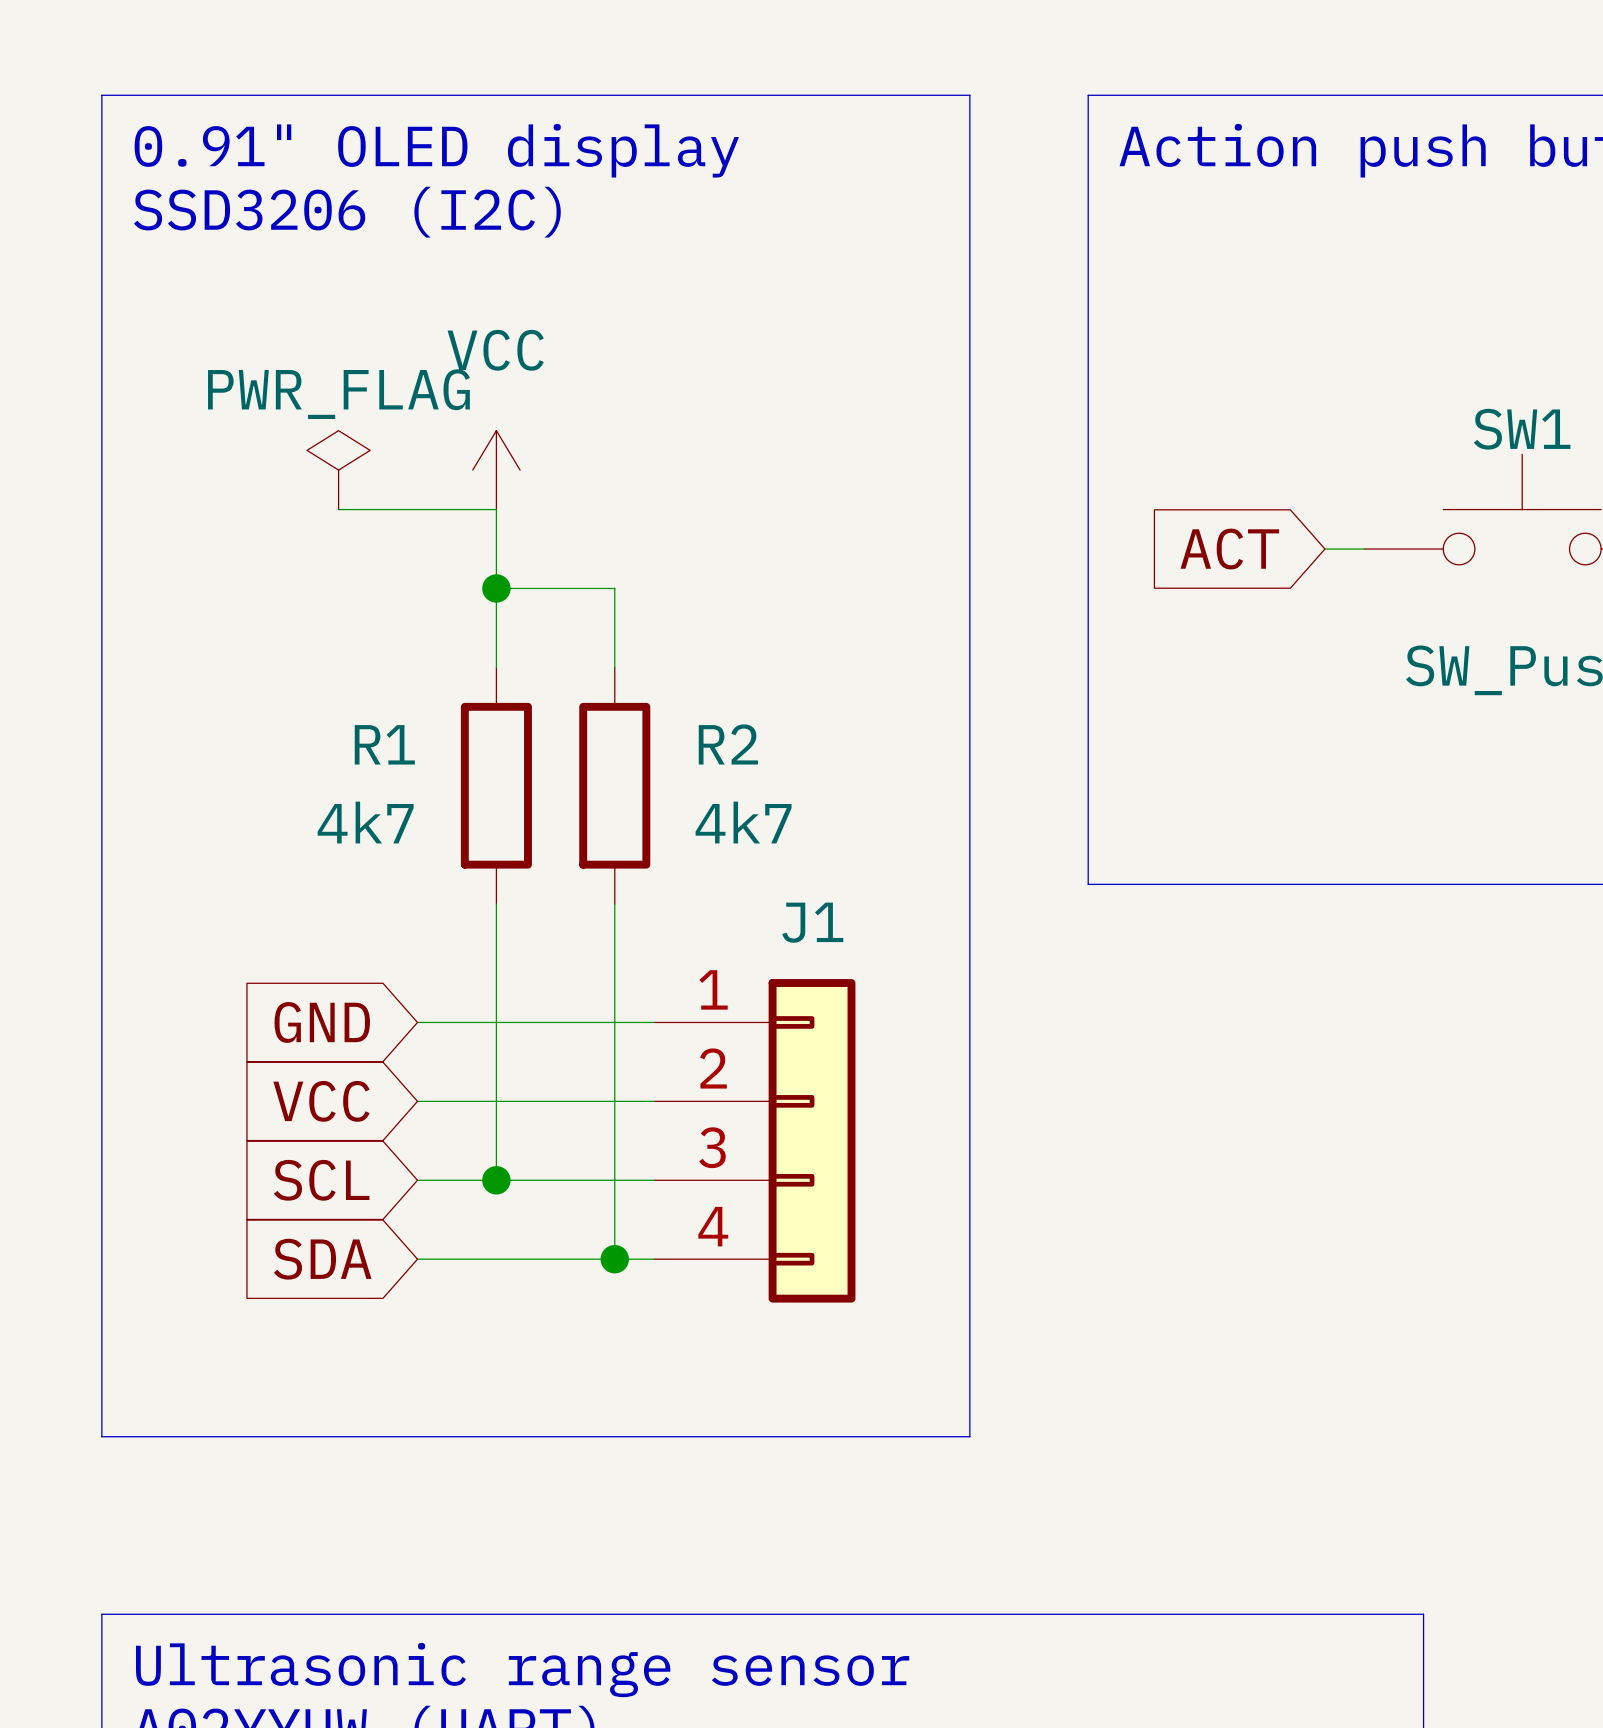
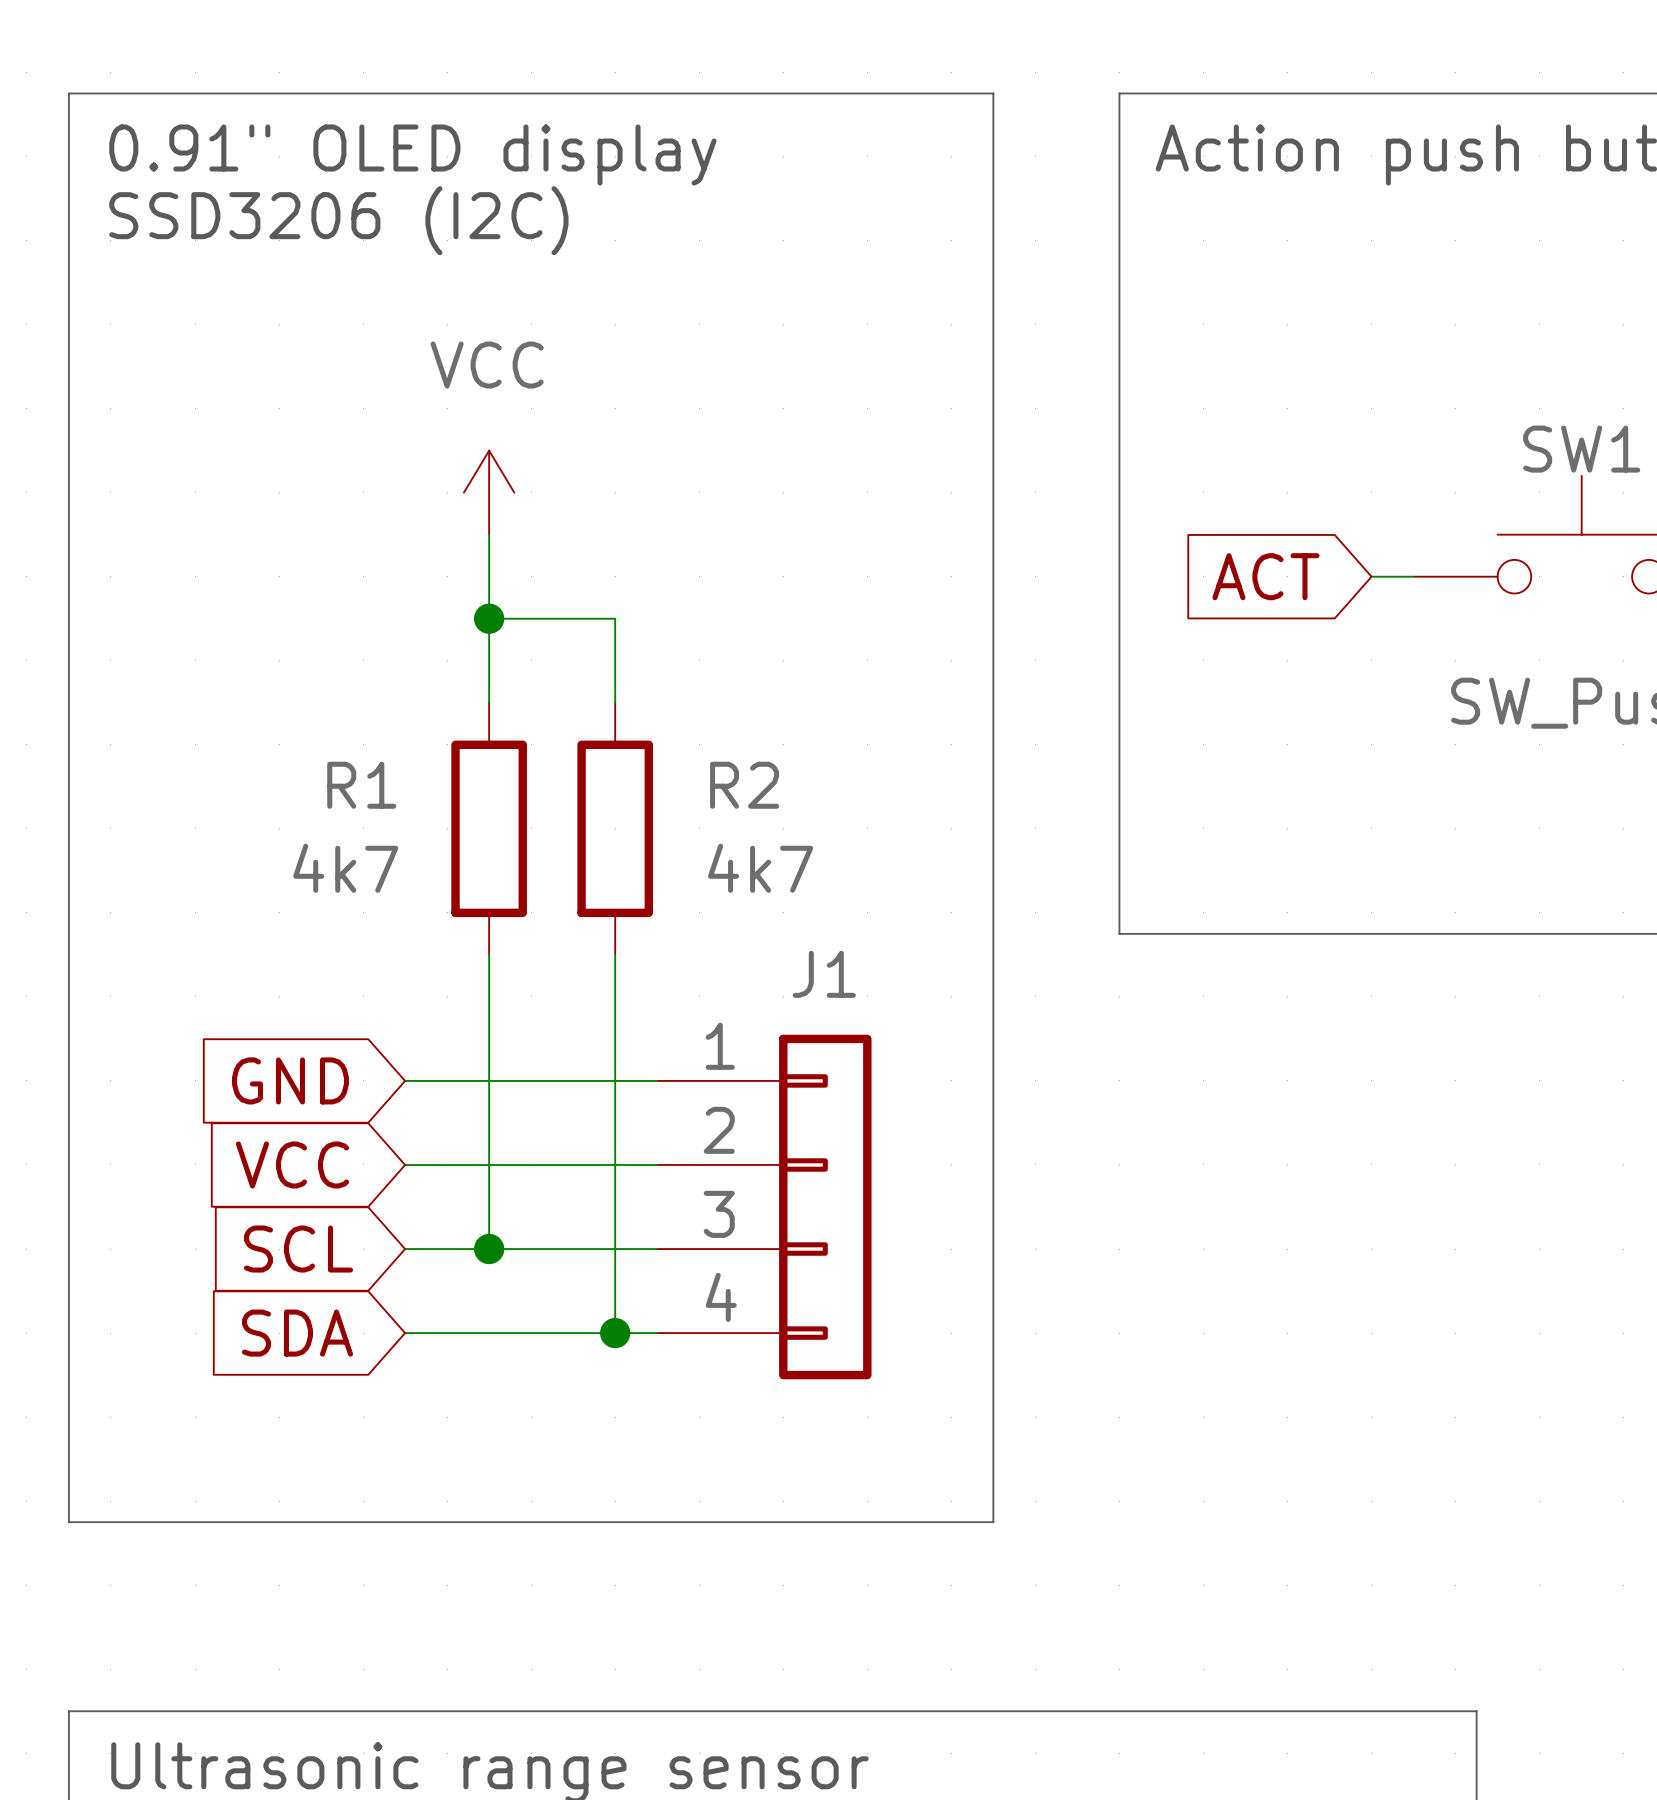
power symbol: PWR_FLAG (338, 470) -> none
wire: (338, 509) (496, 509) -> none

